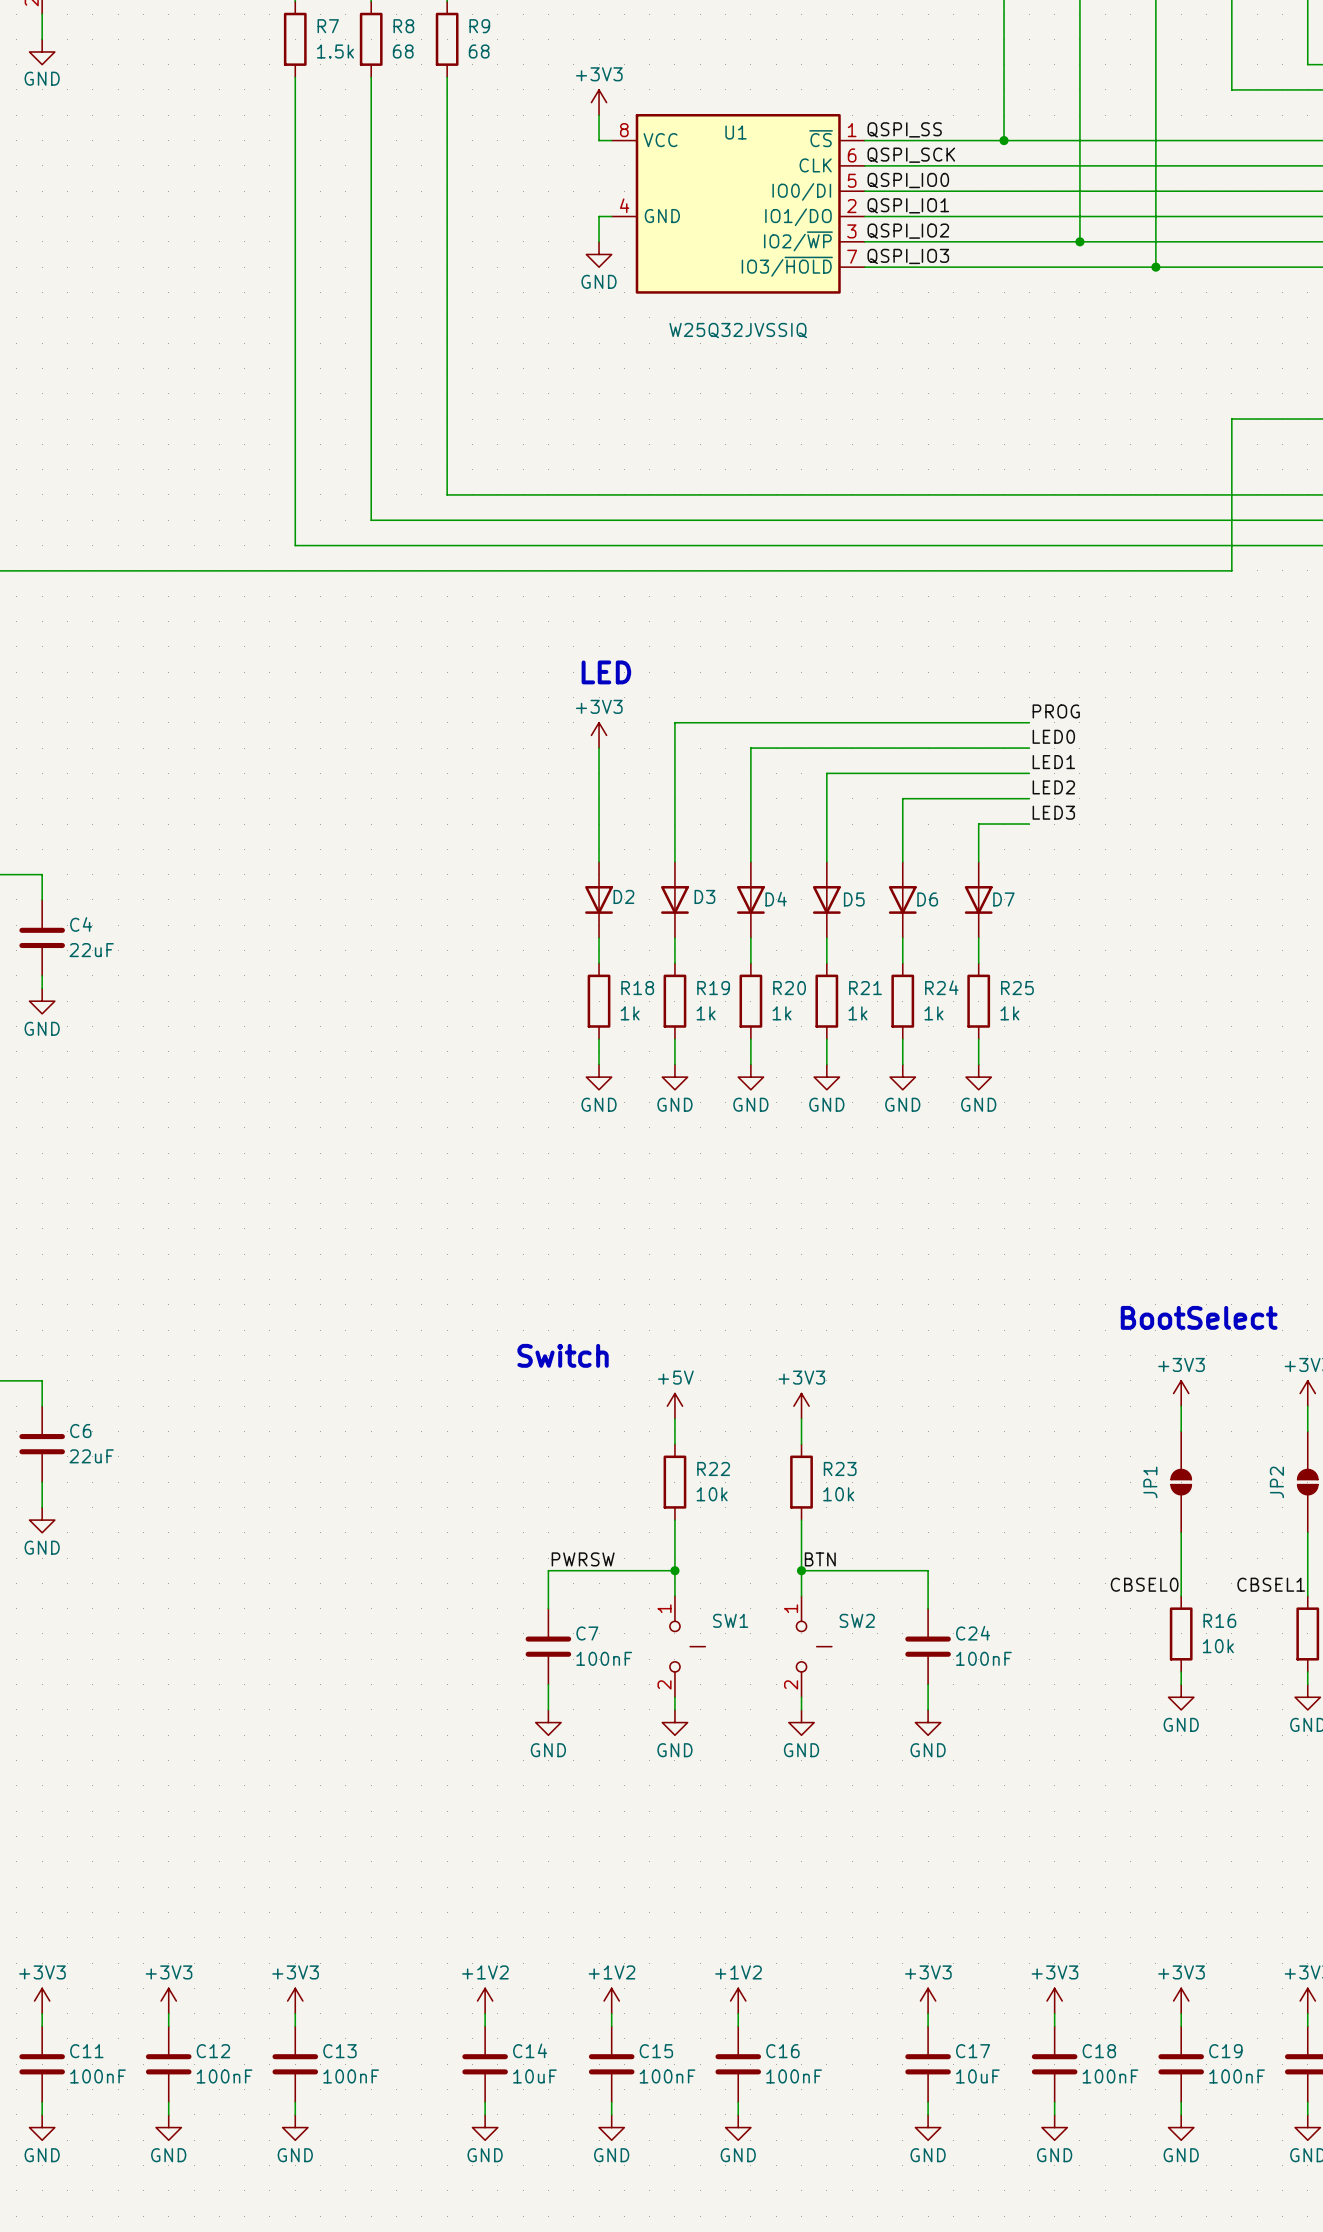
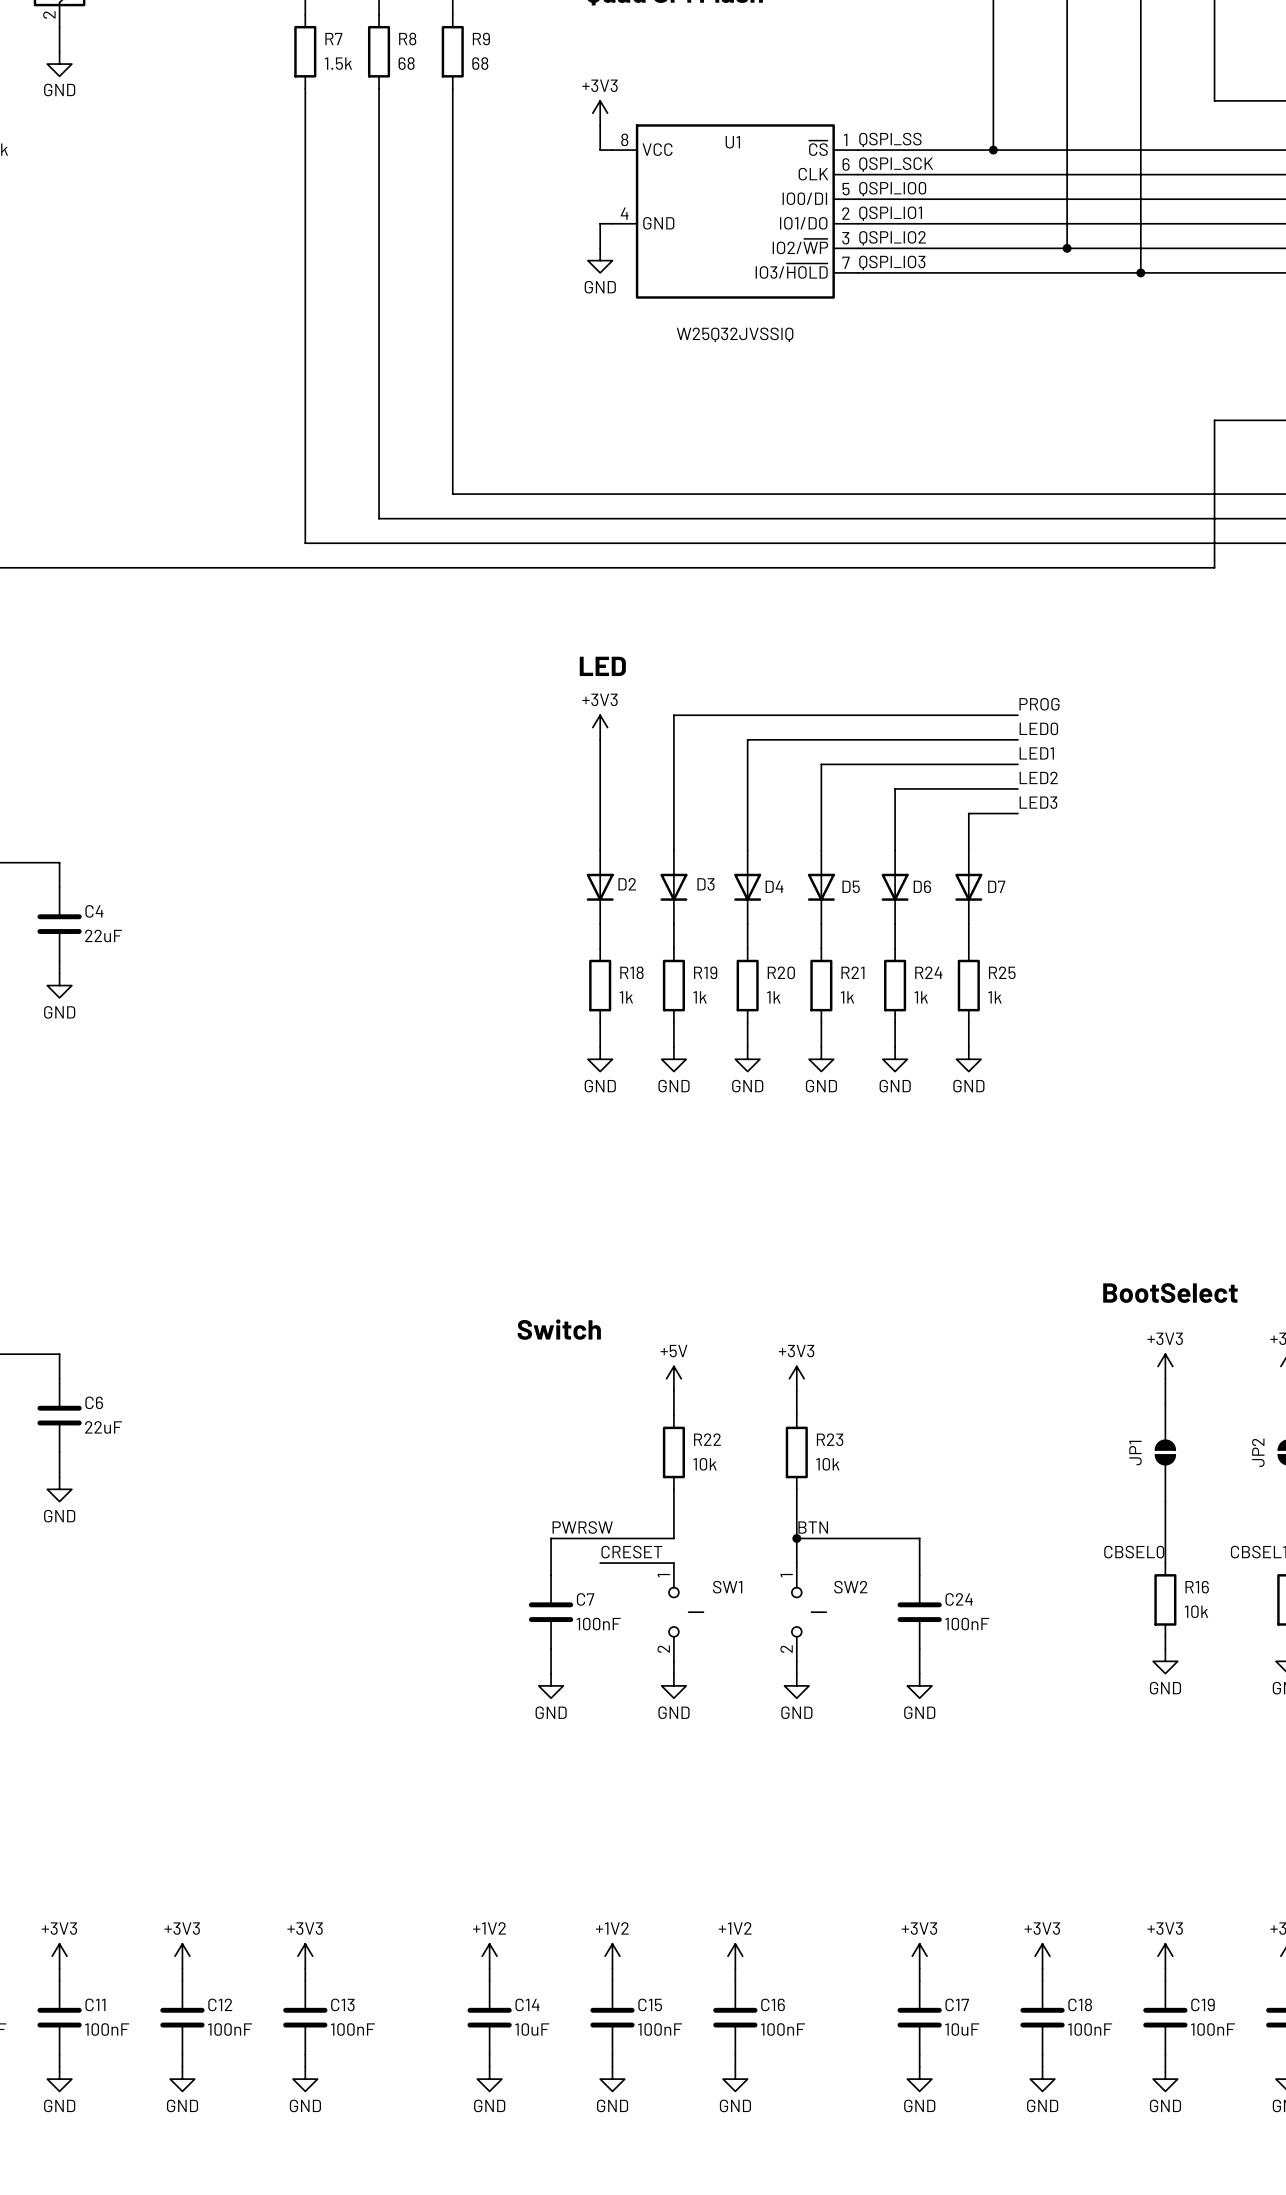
wire: (674, 1570) (674, 1596) -> (600, 1563) (673, 1563)
junction: (674, 1570) -> none
label: none -> CRESET (631, 1552)

